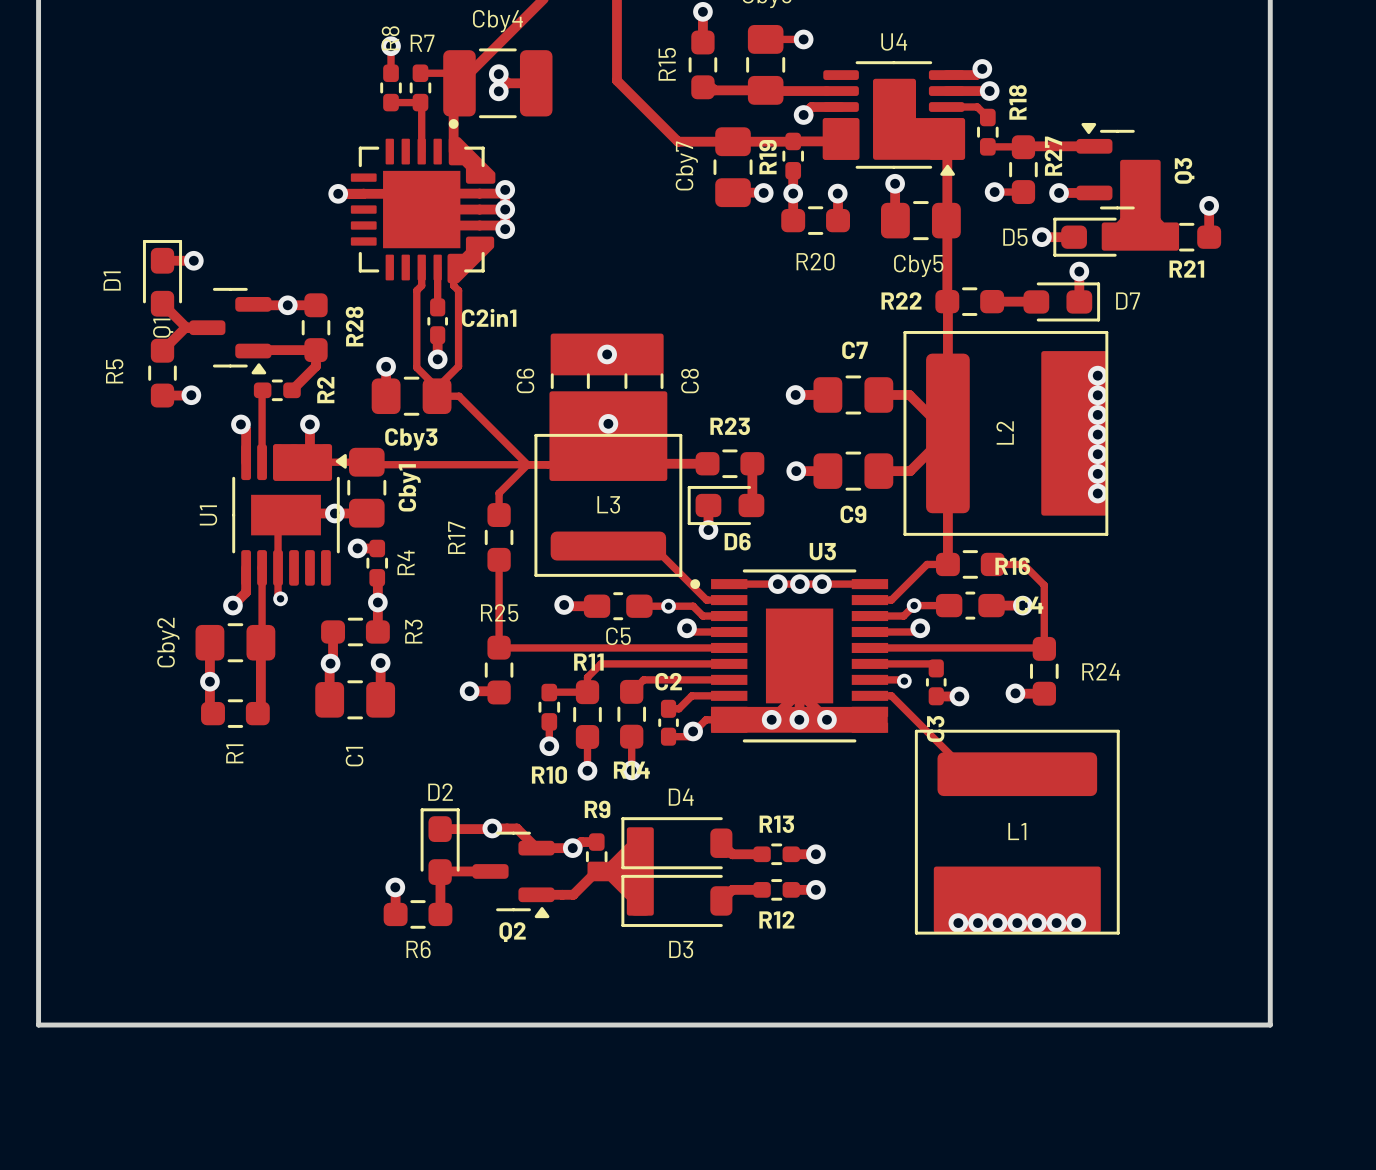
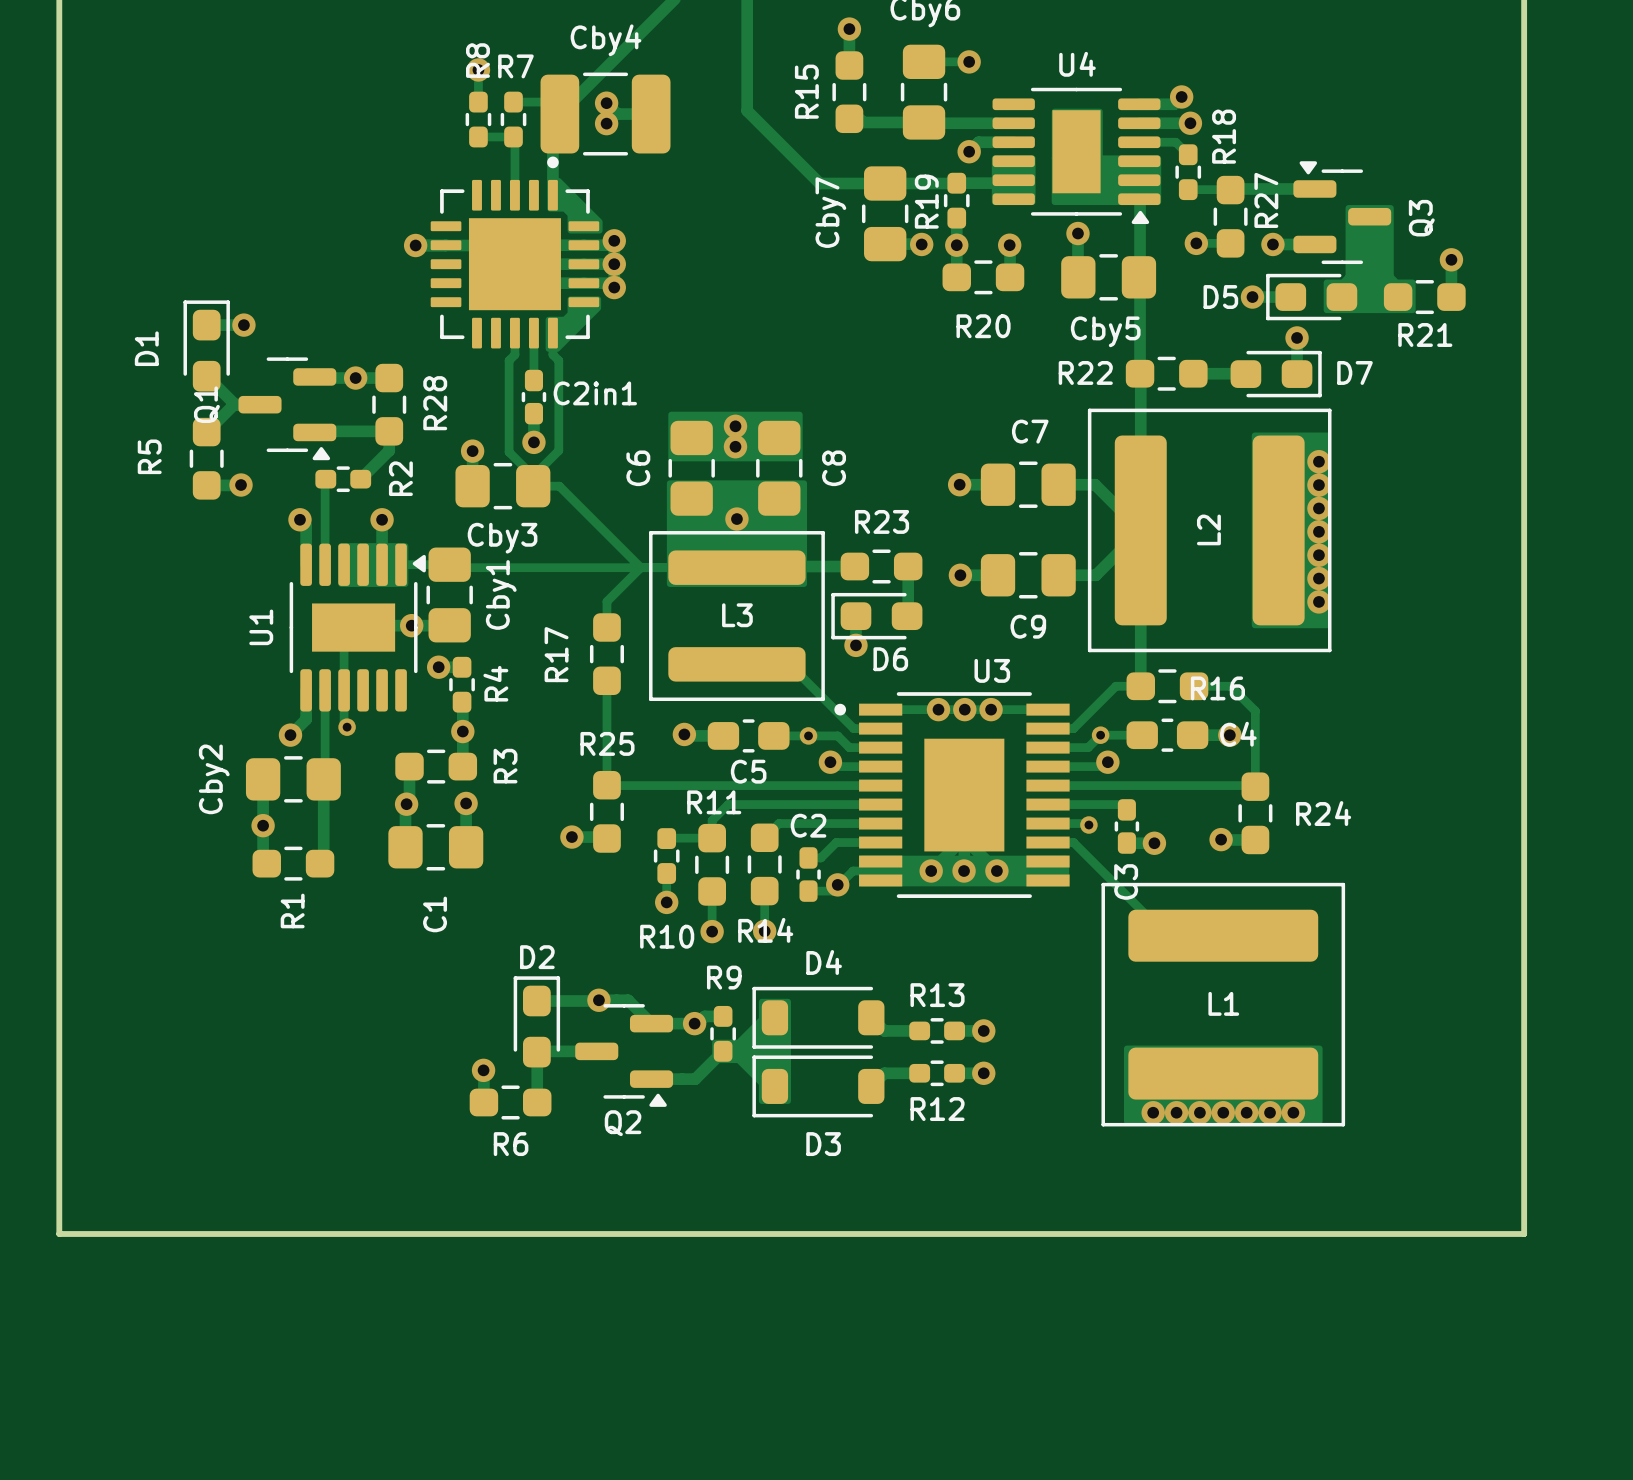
via: none -> (735, 426)
via: (607, 354) -> none
via: none -> (735, 446)

